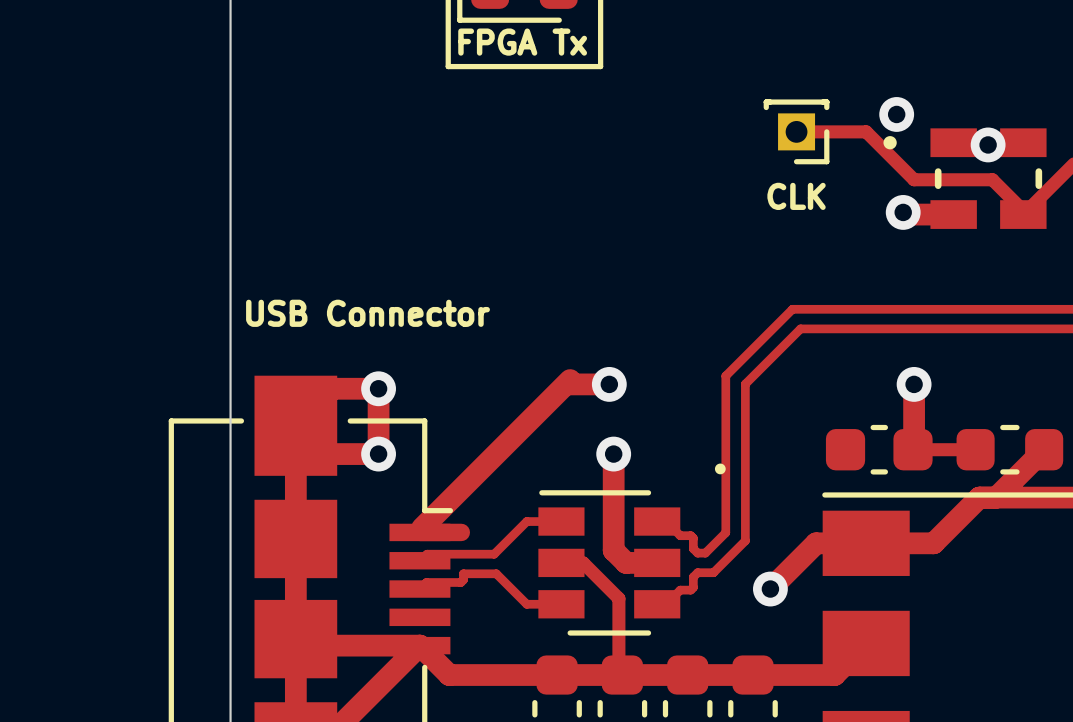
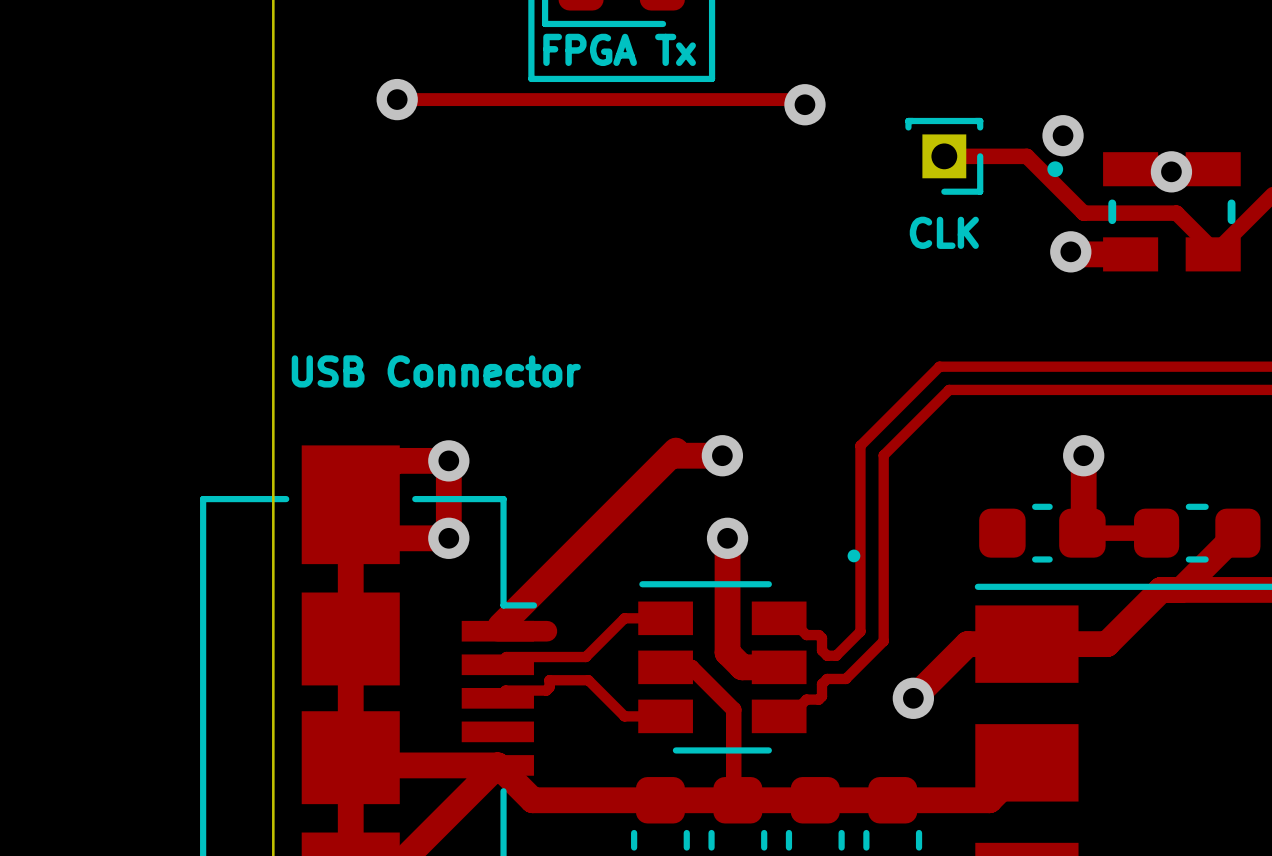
track: none -> (397, 99) (799, 99) (804, 104)
via: none -> (397, 99)
via: none -> (804, 104)

